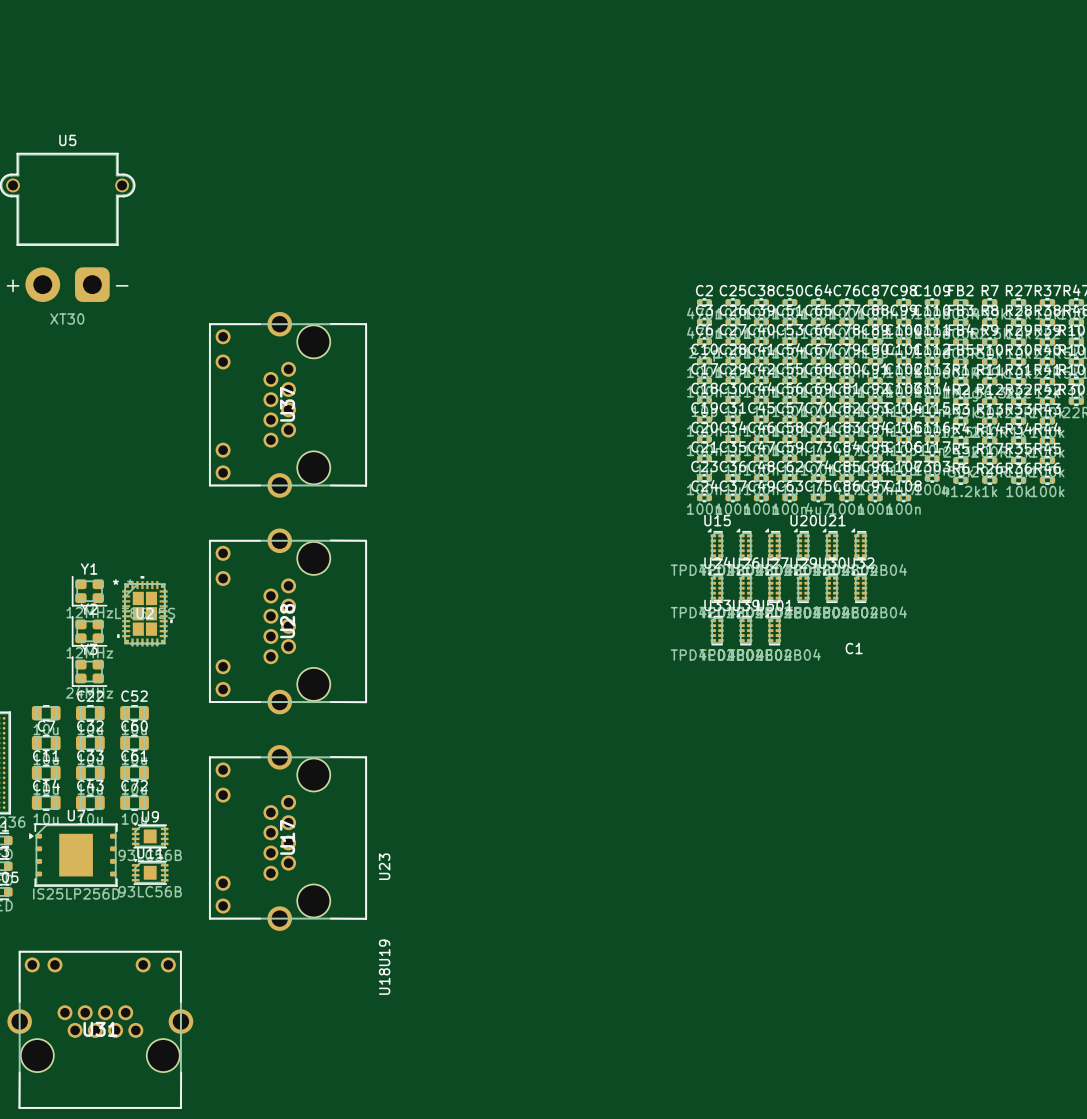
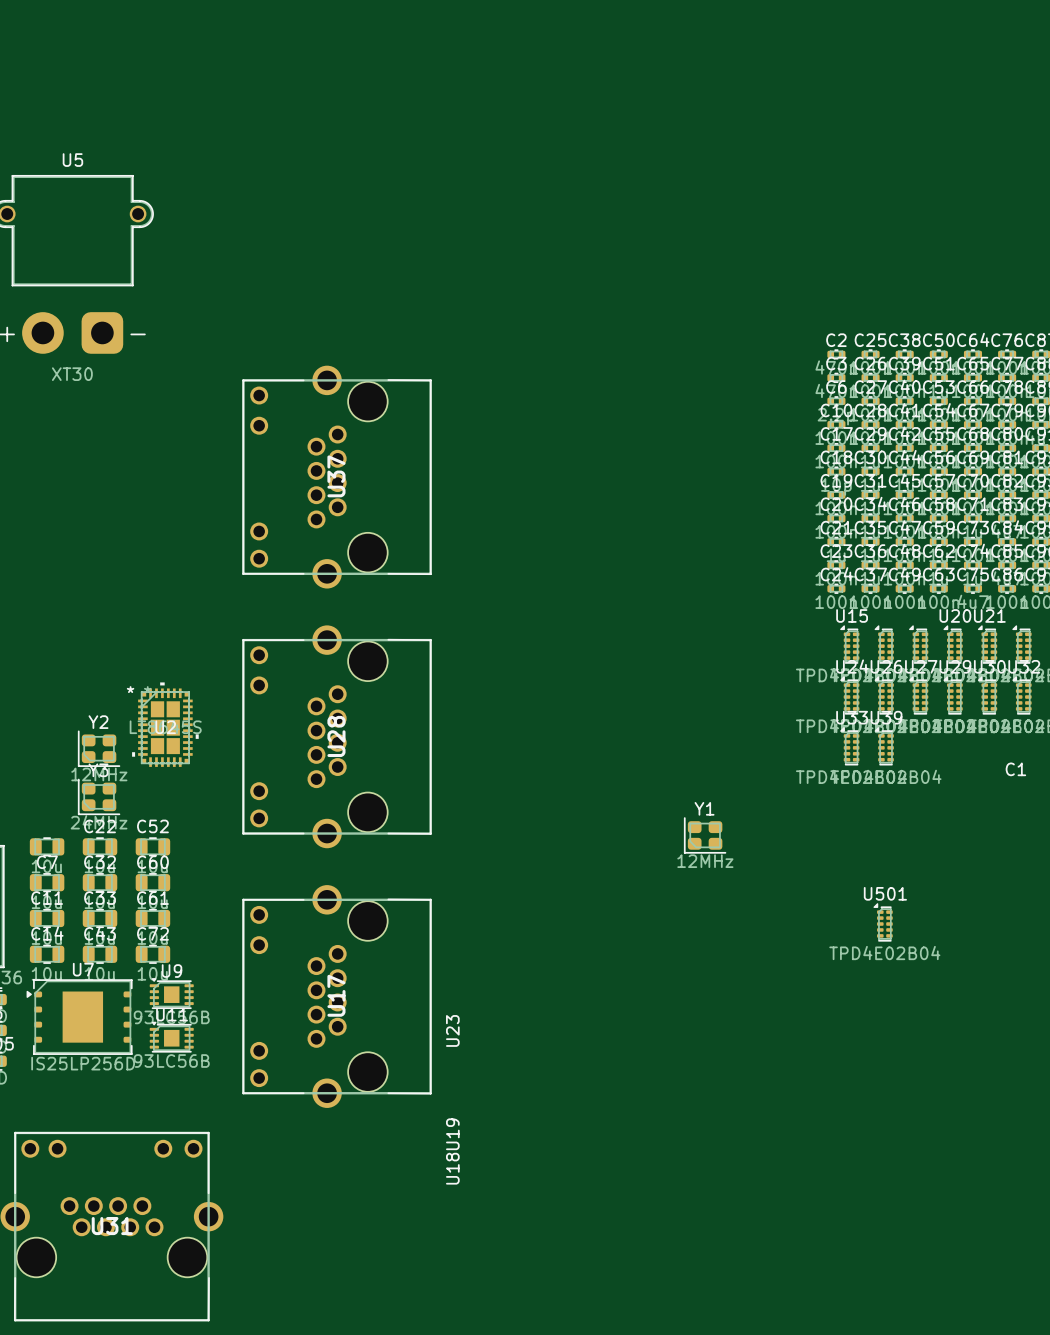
Y1 position: (89, 591) -> (705, 835)
U501 position: (773, 629) -> (883, 922)

